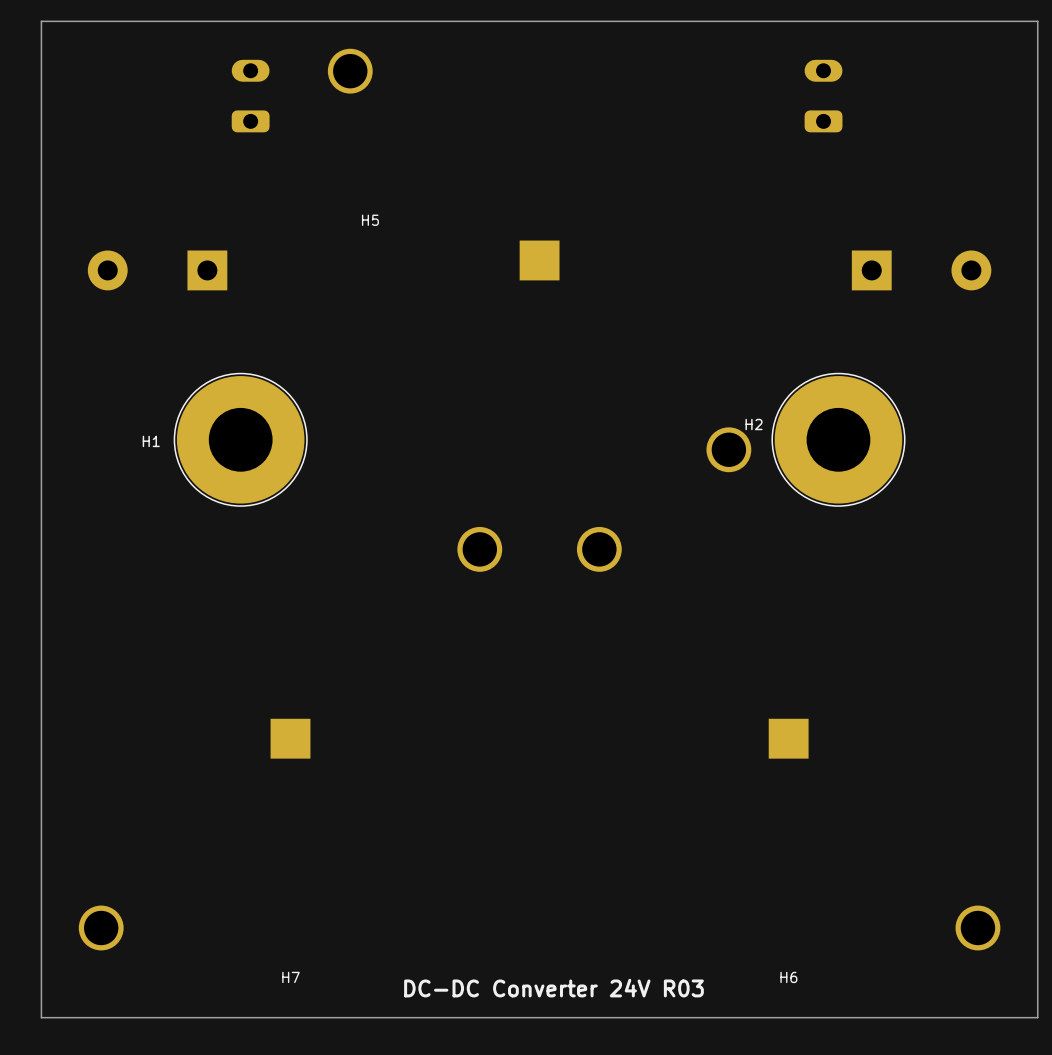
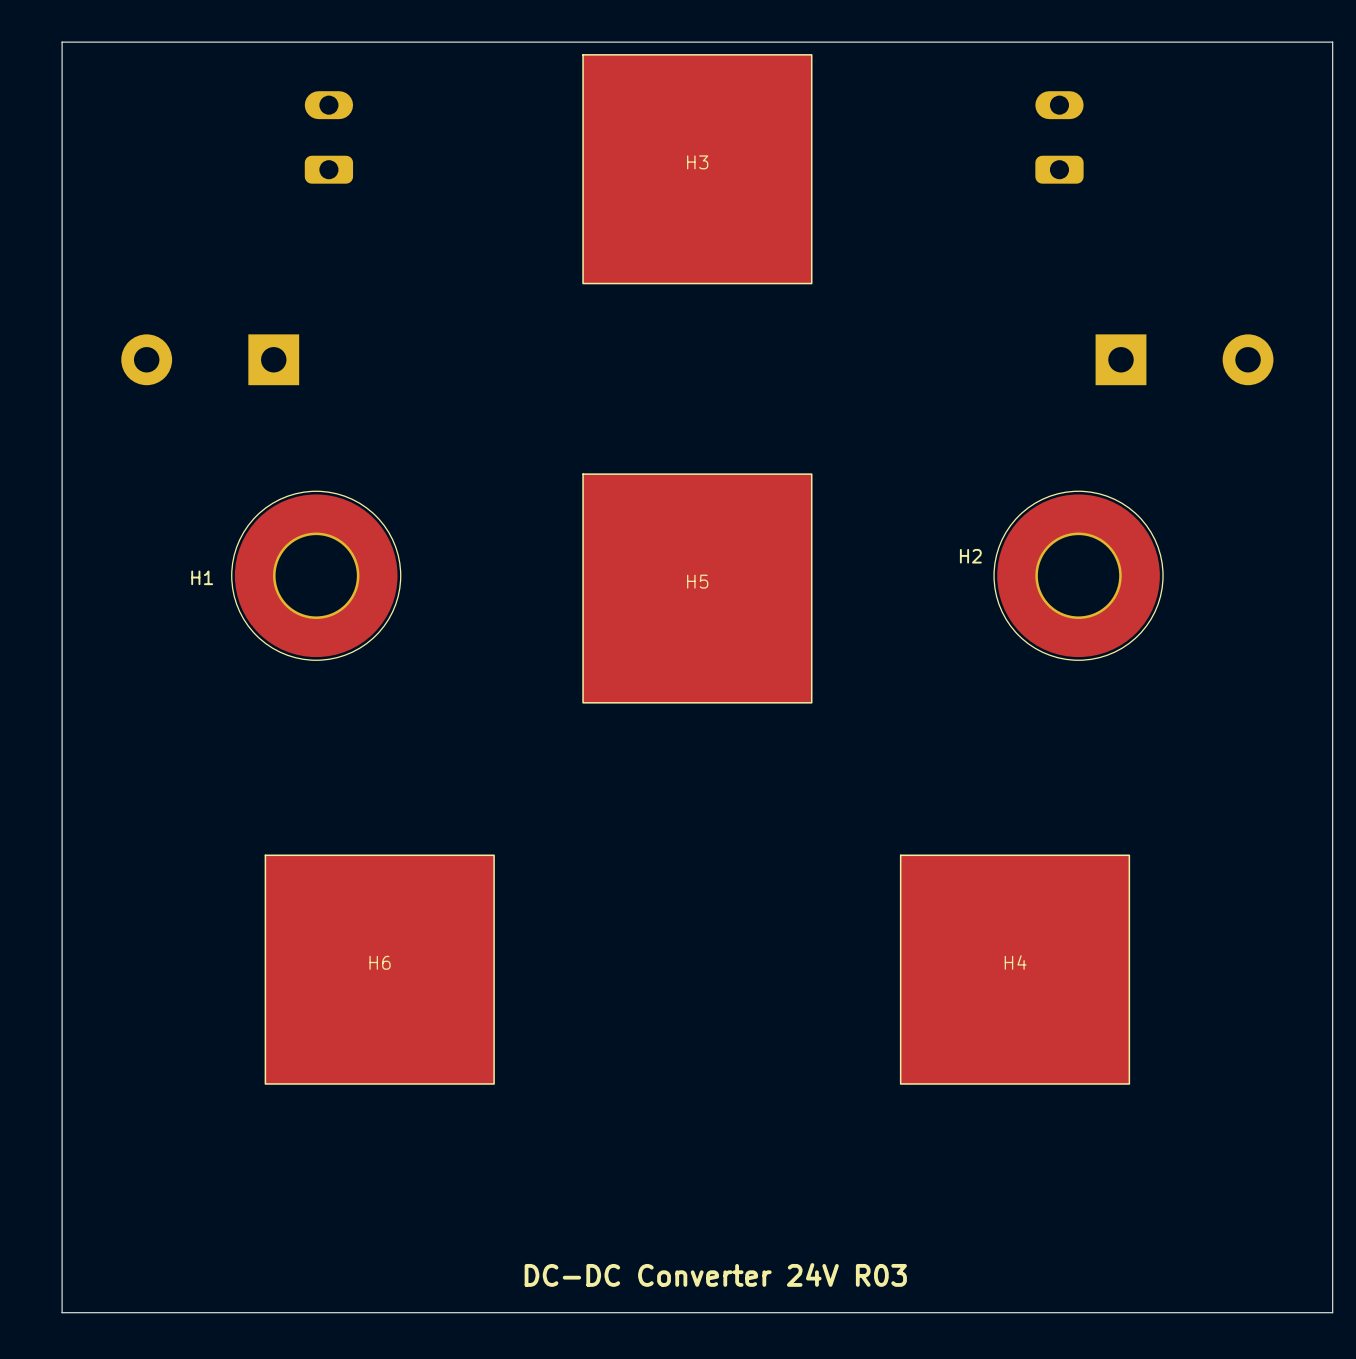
H5 footprint: [327, 48, 752, 473] -> [582, 473, 813, 704]
H3: none -> (697, 169)
H5 name position: H5 (370, 220) -> H5 (697, 581)
H6 footprint: [576, 526, 1001, 951] -> [264, 854, 495, 1085]
H7: (290, 738) -> none
H4: none -> (1015, 969)
H6 name position: H6 (788, 977) -> H6 (380, 962)

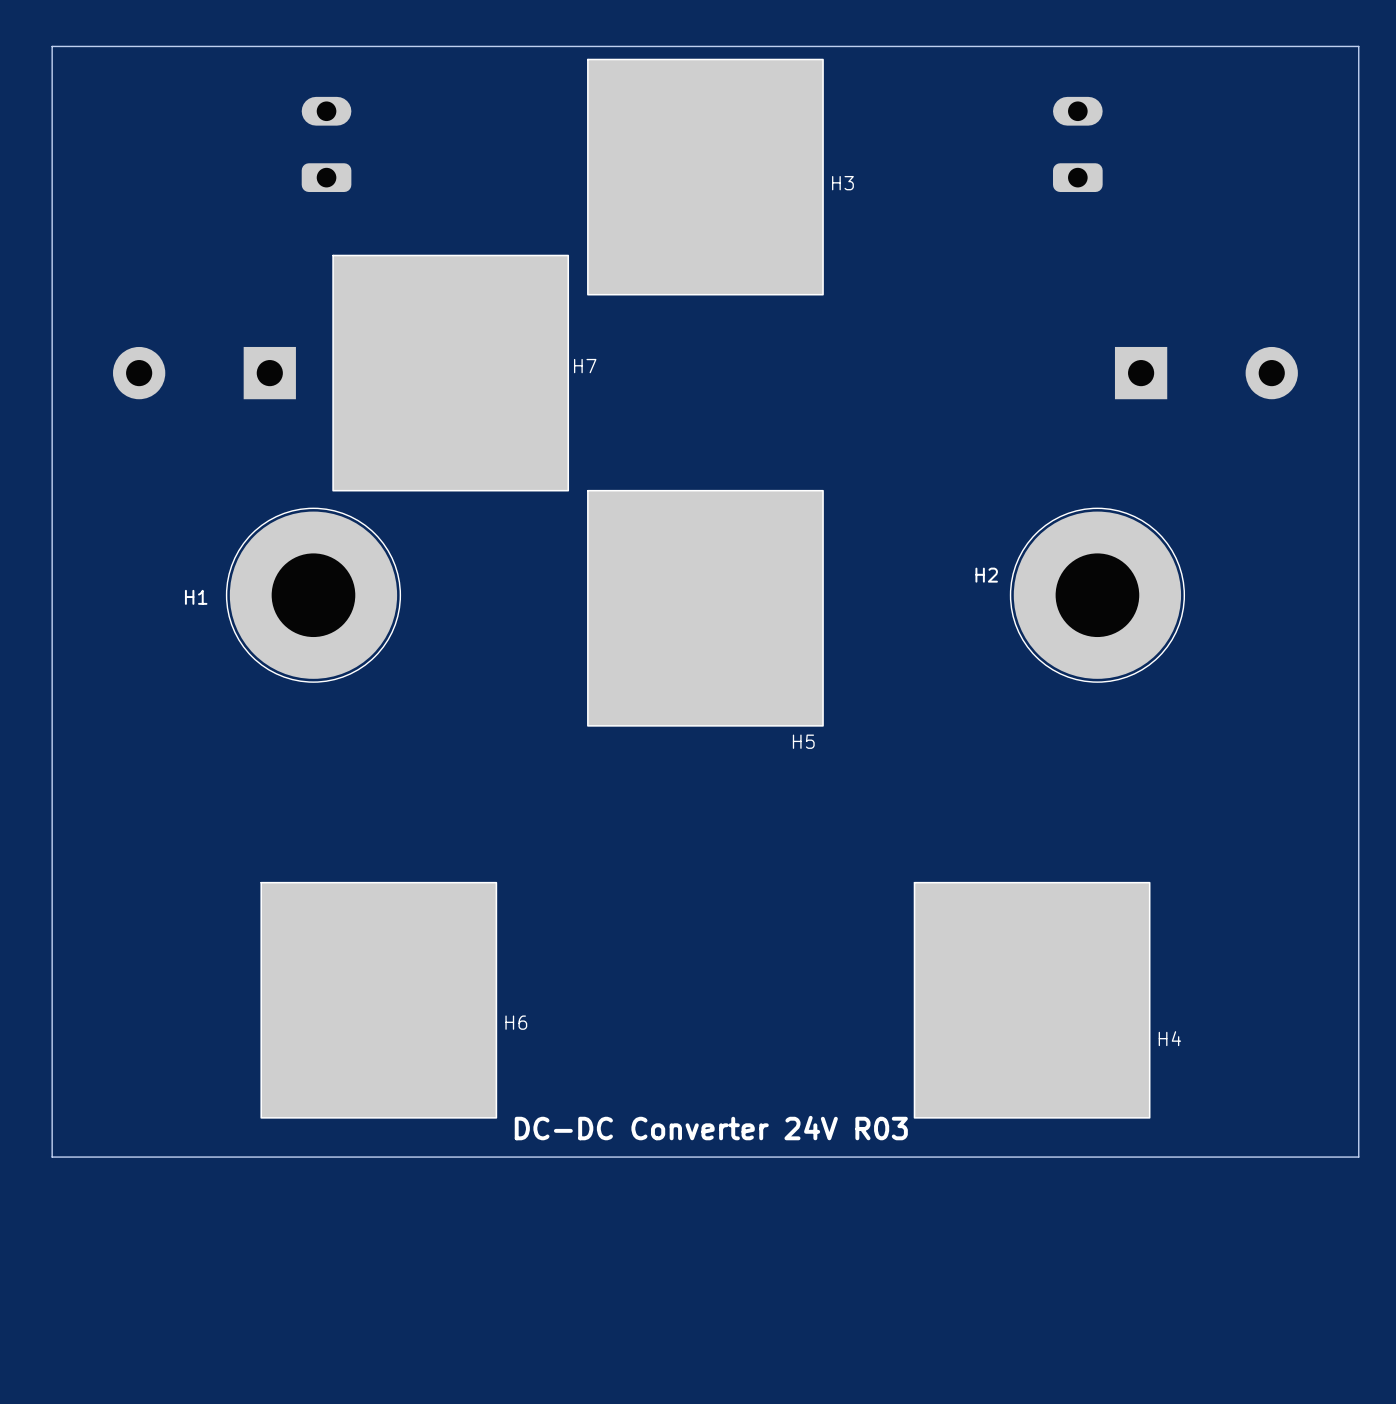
H3 name position: H3 (697, 162) -> H3 (842, 183)
H7: none -> (450, 373)
H5 name position: H5 (697, 581) -> H5 (803, 741)
H6 name position: H6 (380, 962) -> H6 (516, 1022)
H4 name position: H4 (1015, 962) -> H4 (1169, 1038)
board edge: (62, 1122) (62, 1312) (1332, 1312) (1332, 1122) -> (52, 1157) (1358, 1157)
text position: DC-DC Converter 24V R03 (715, 1274) -> DC-DC Converter 24V R03 (711, 1128)

